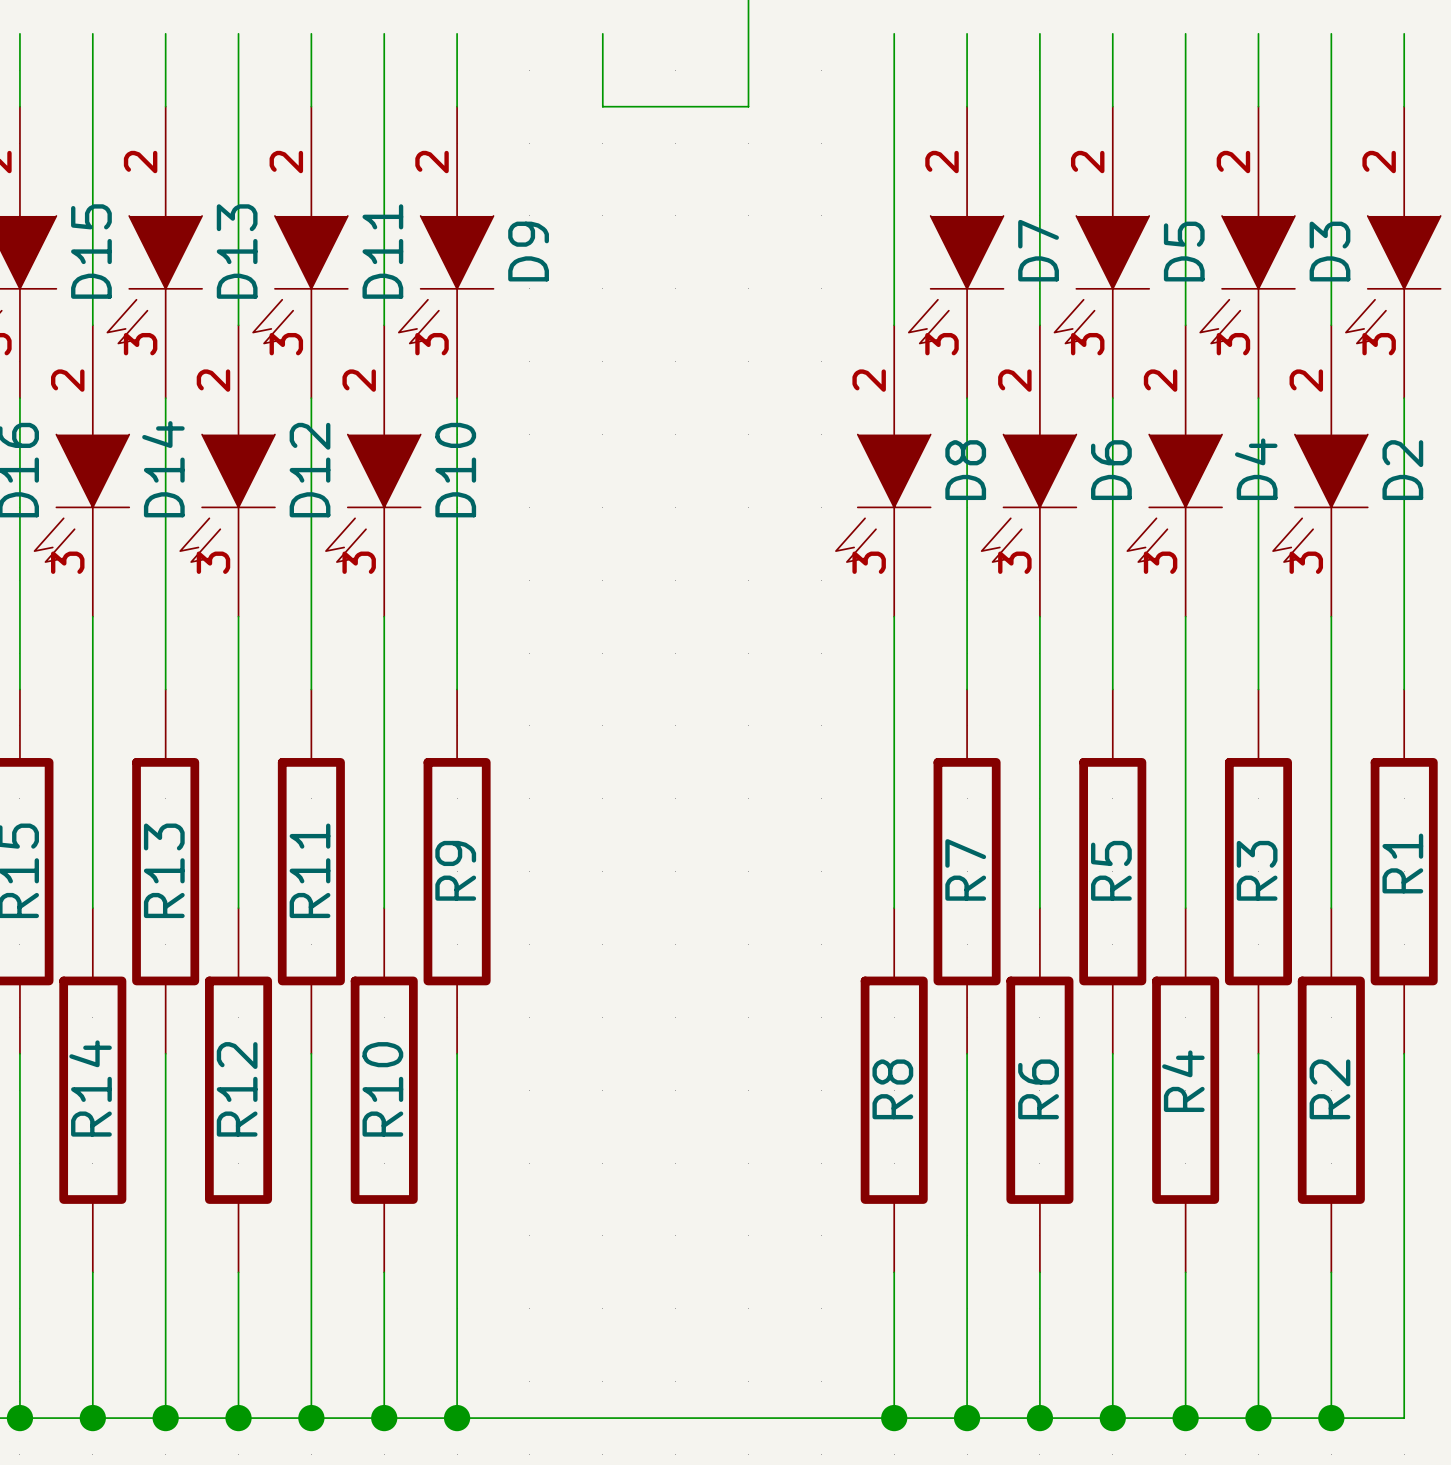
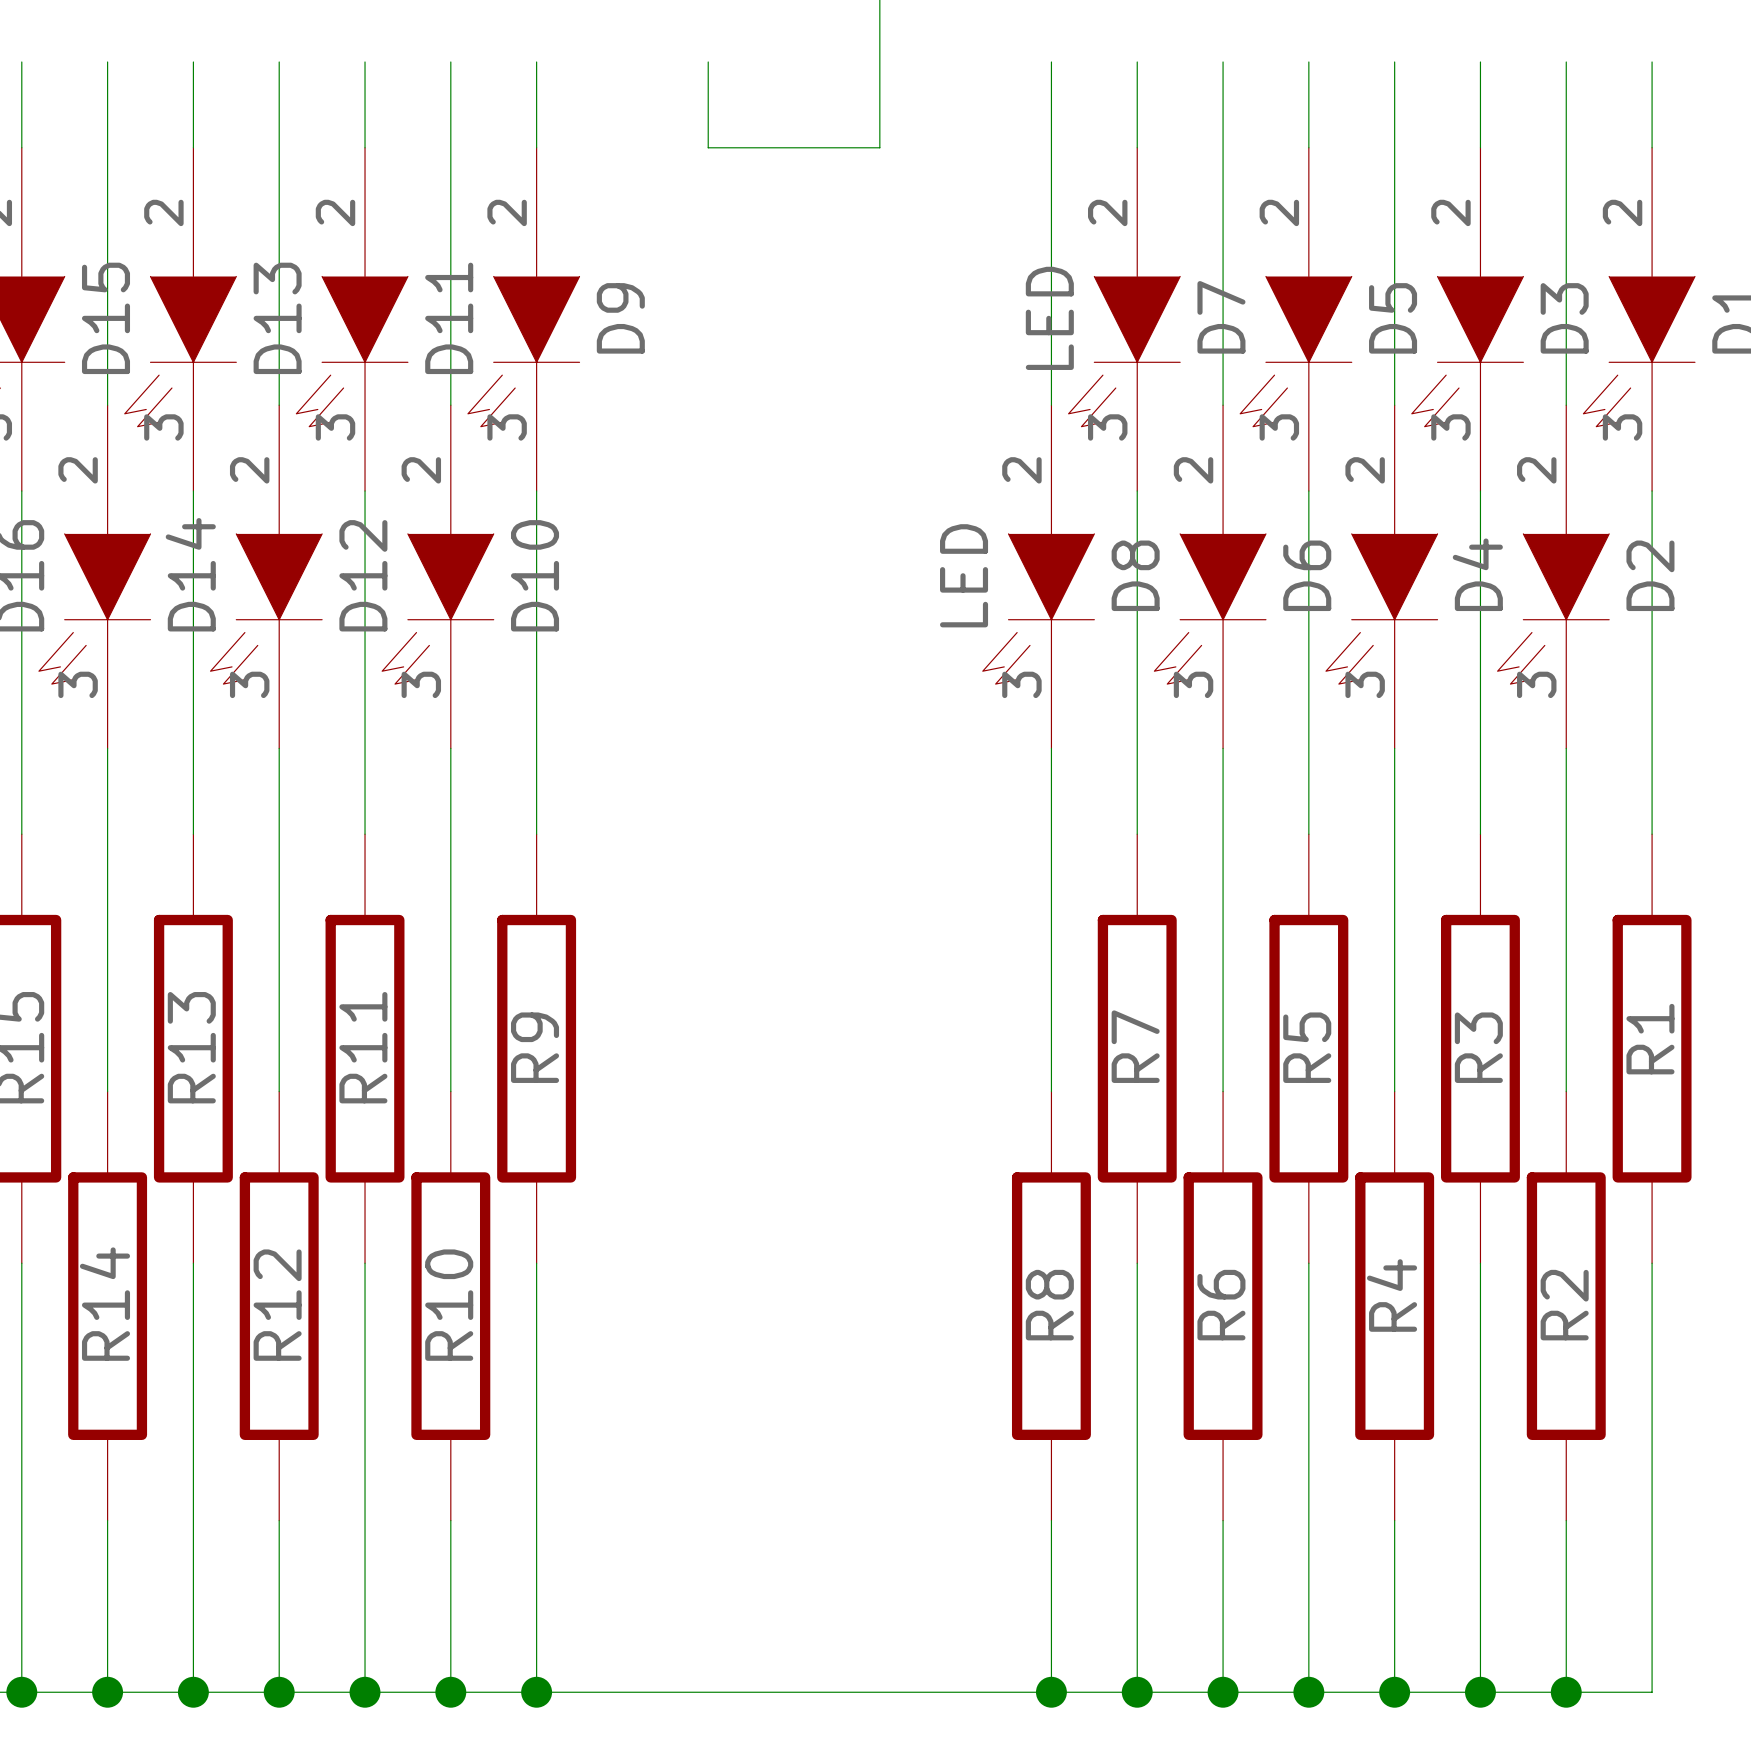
D7 value: none -> LED (1049, 318)
D8 value: none -> LED (964, 575)

